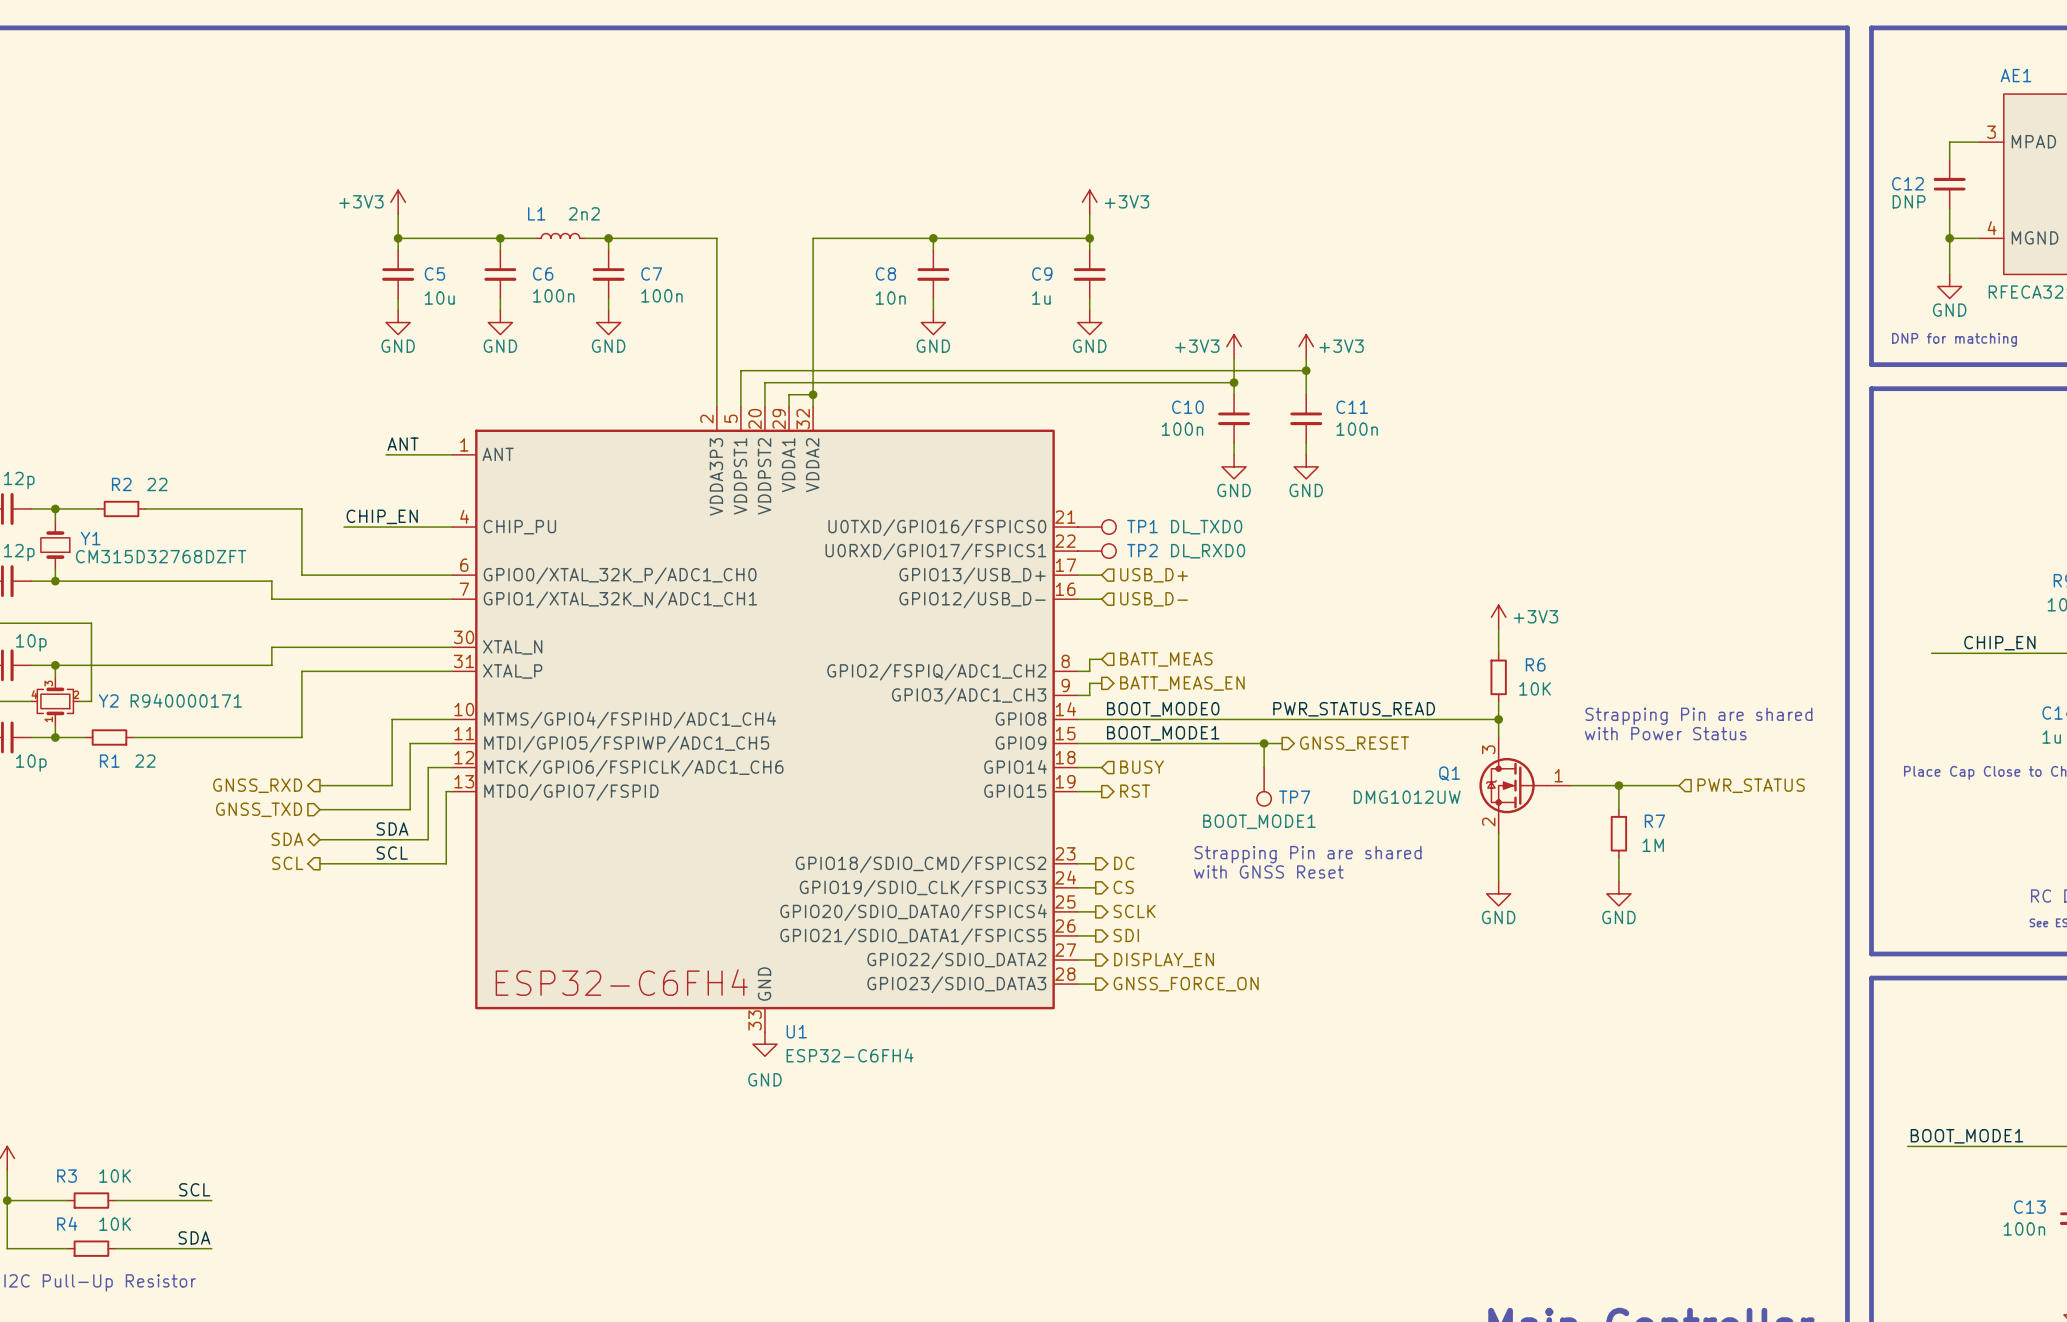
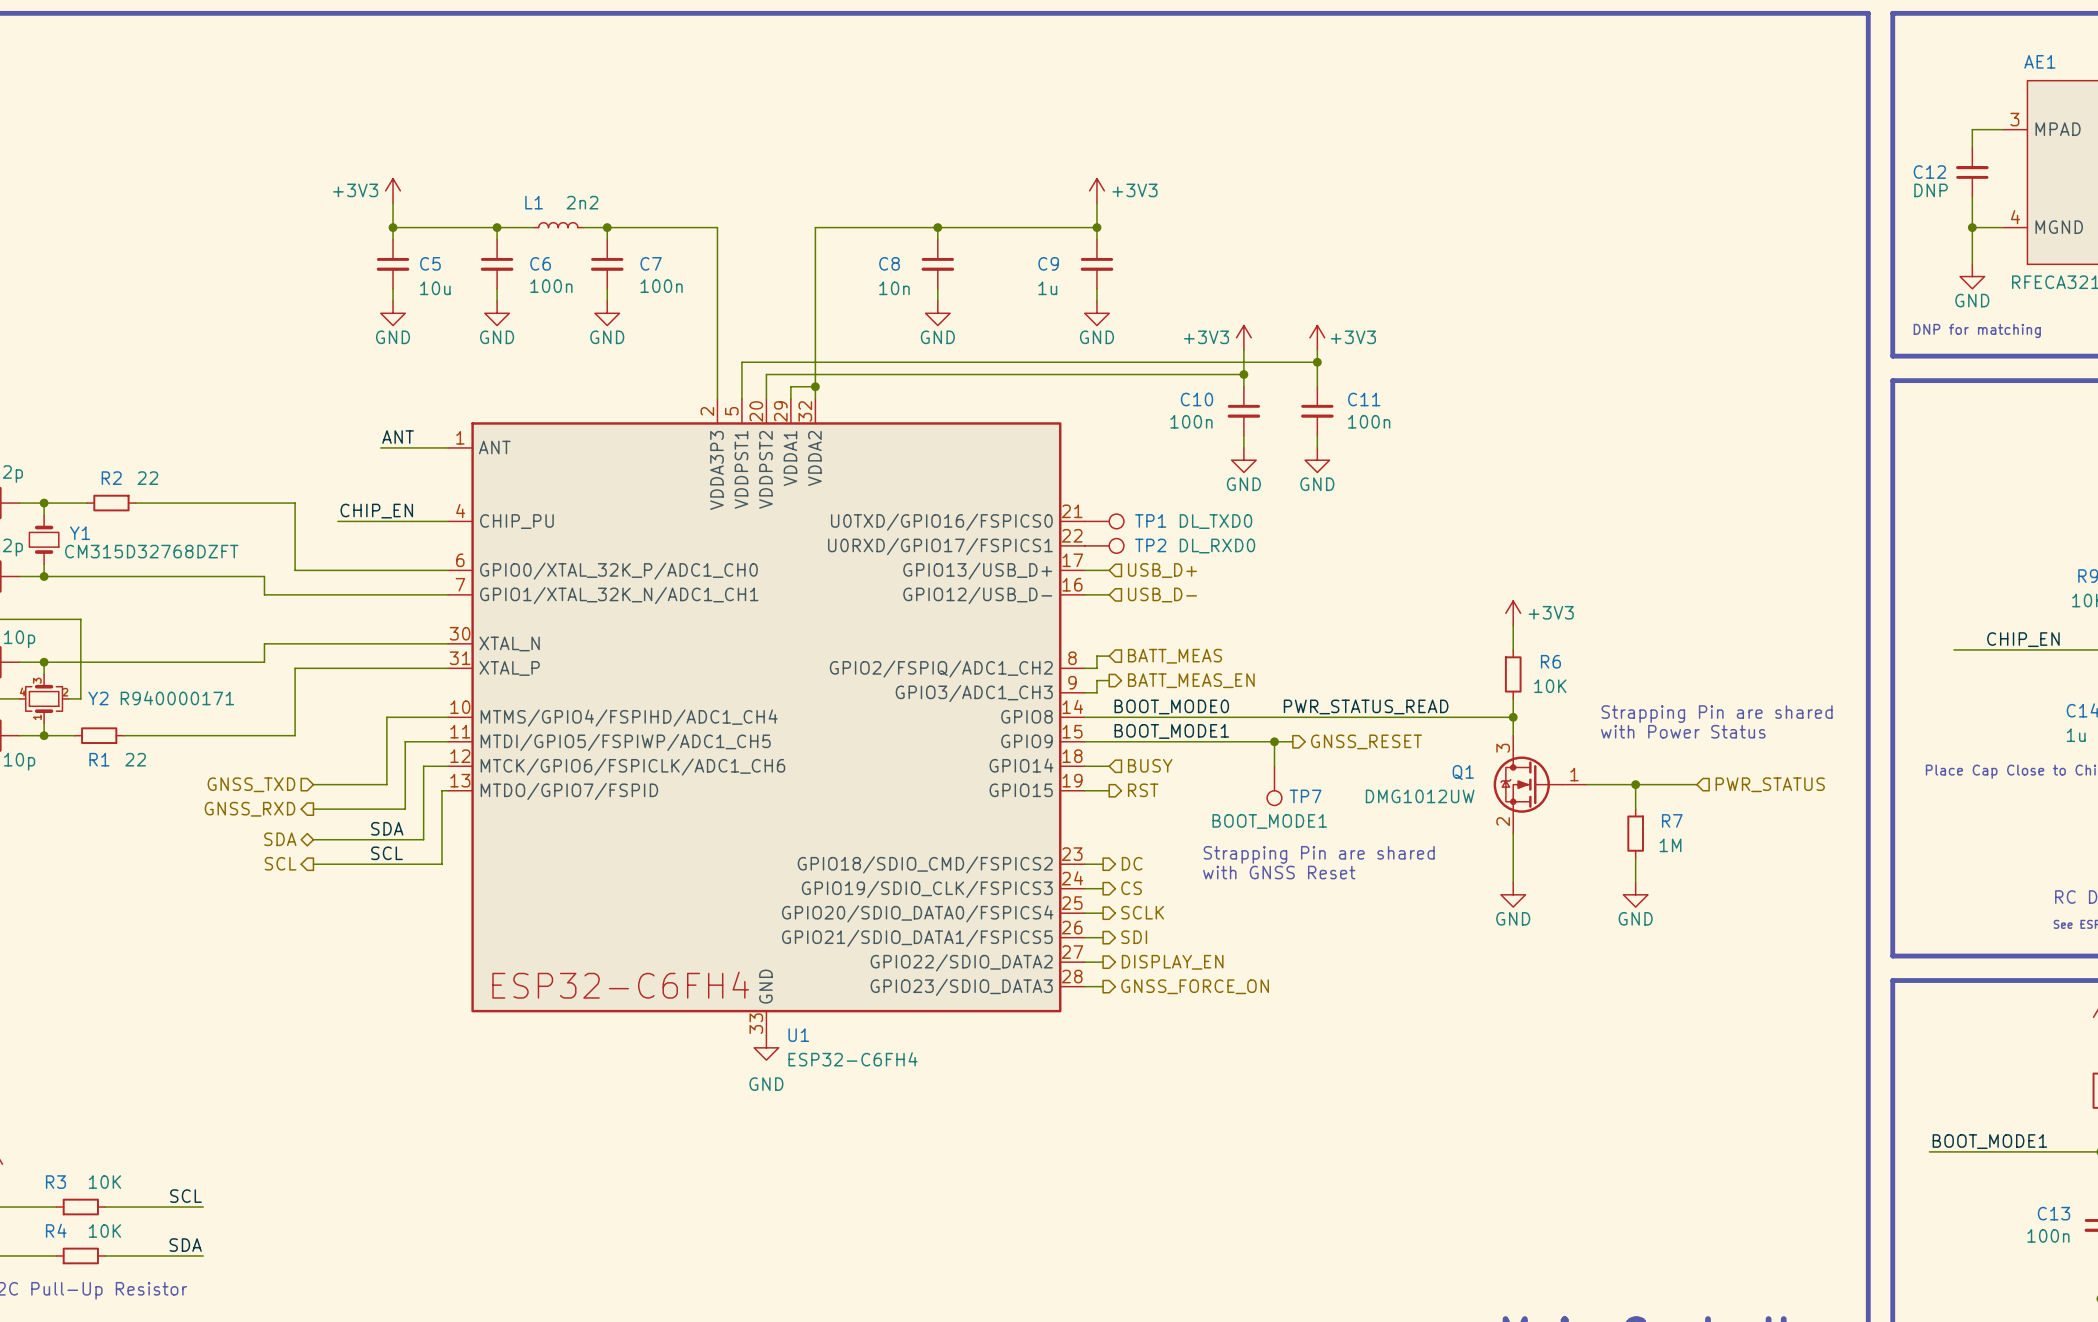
hierarchical label shape: output (257, 785) -> input (251, 784)
hierarchical label: GNSS_RXD (257, 785) -> GNSS_TXD (251, 784)
hierarchical label shape: input (259, 809) -> output (249, 809)
hierarchical label: GNSS_TXD (259, 809) -> GNSS_RXD (249, 809)

